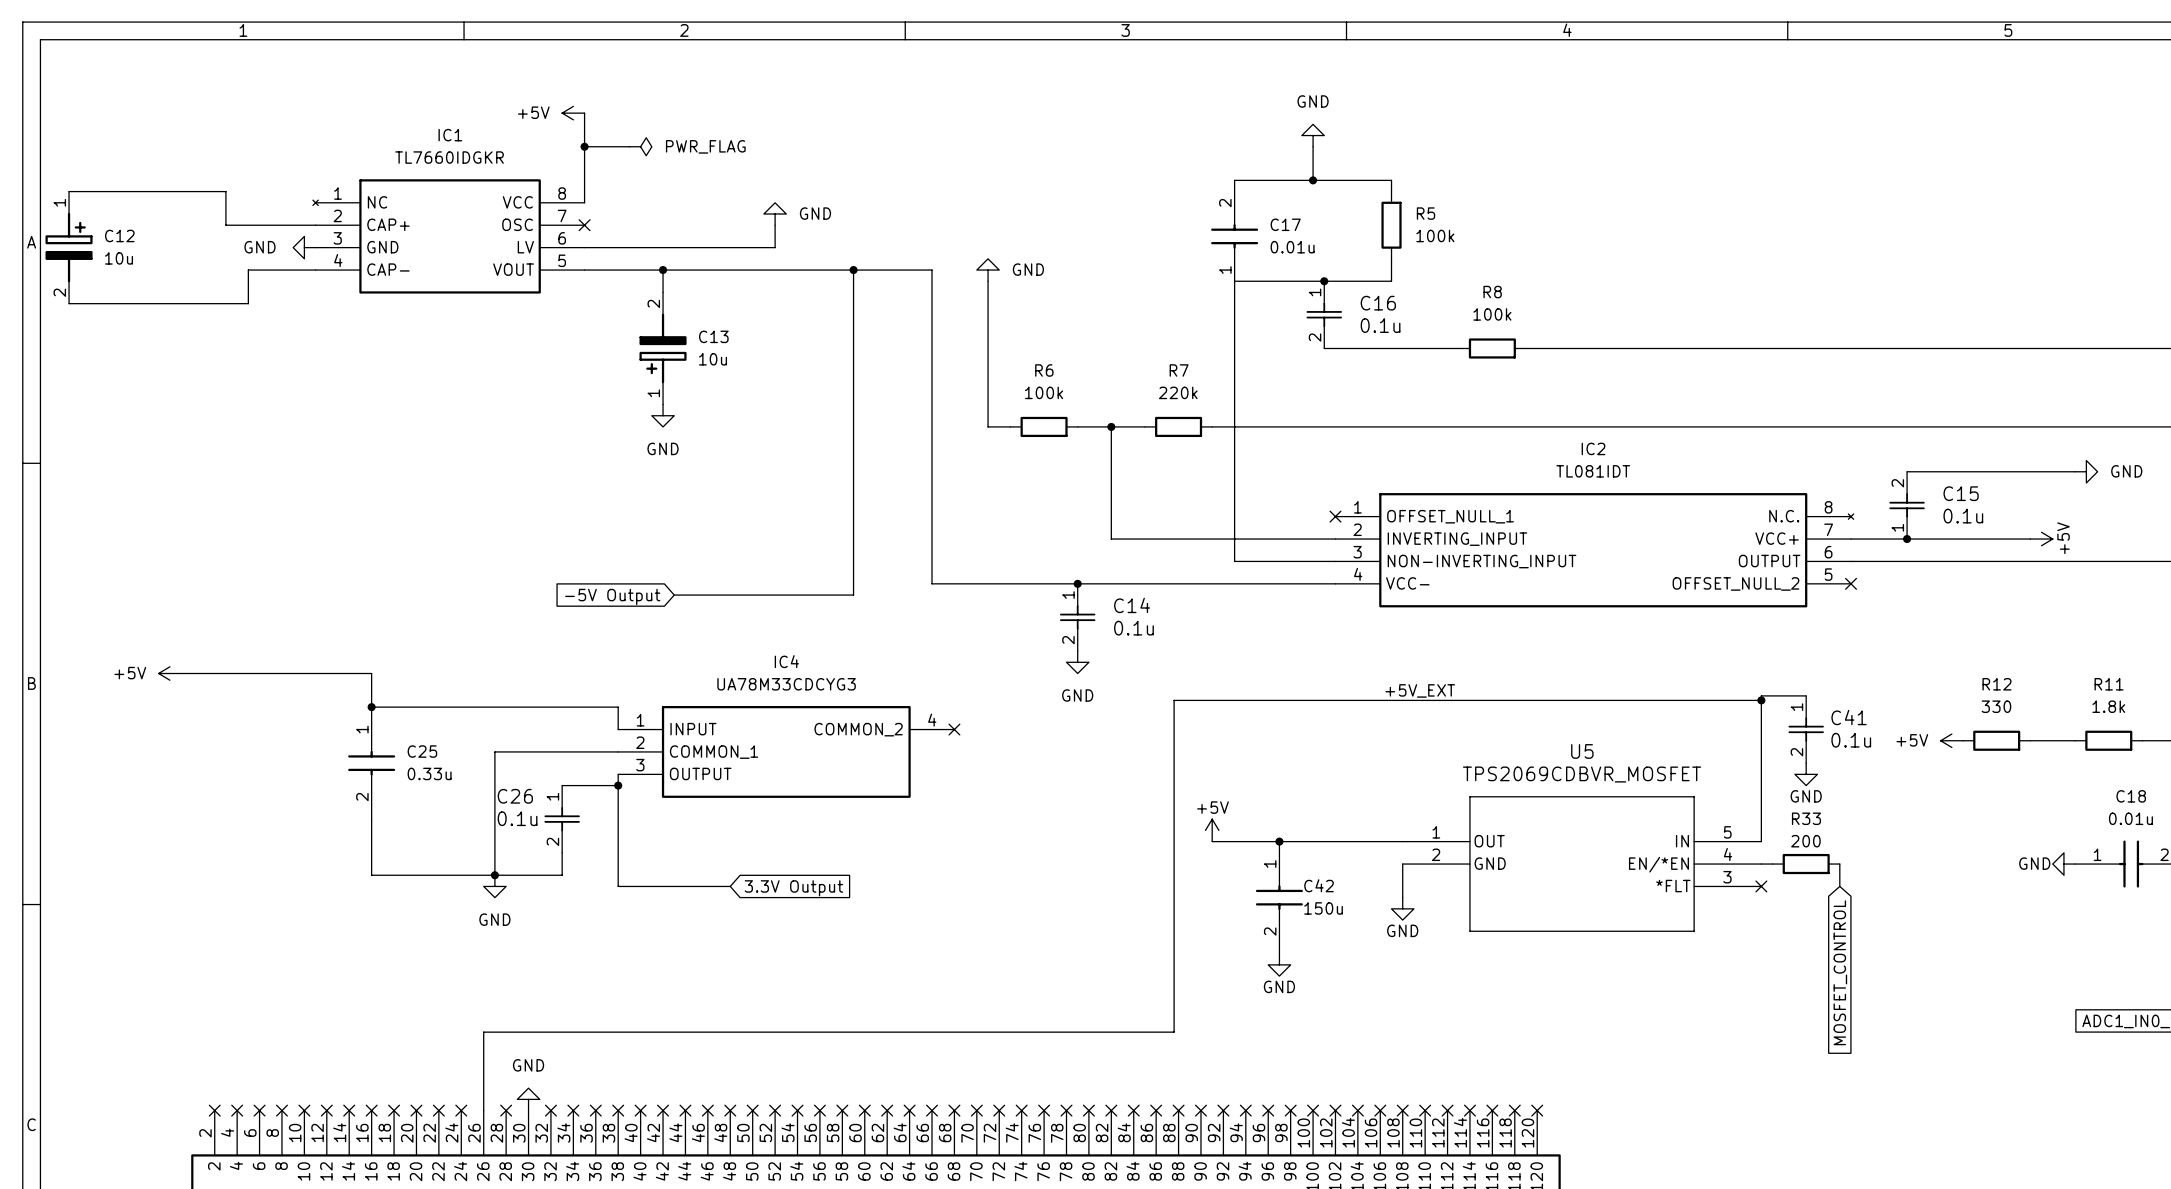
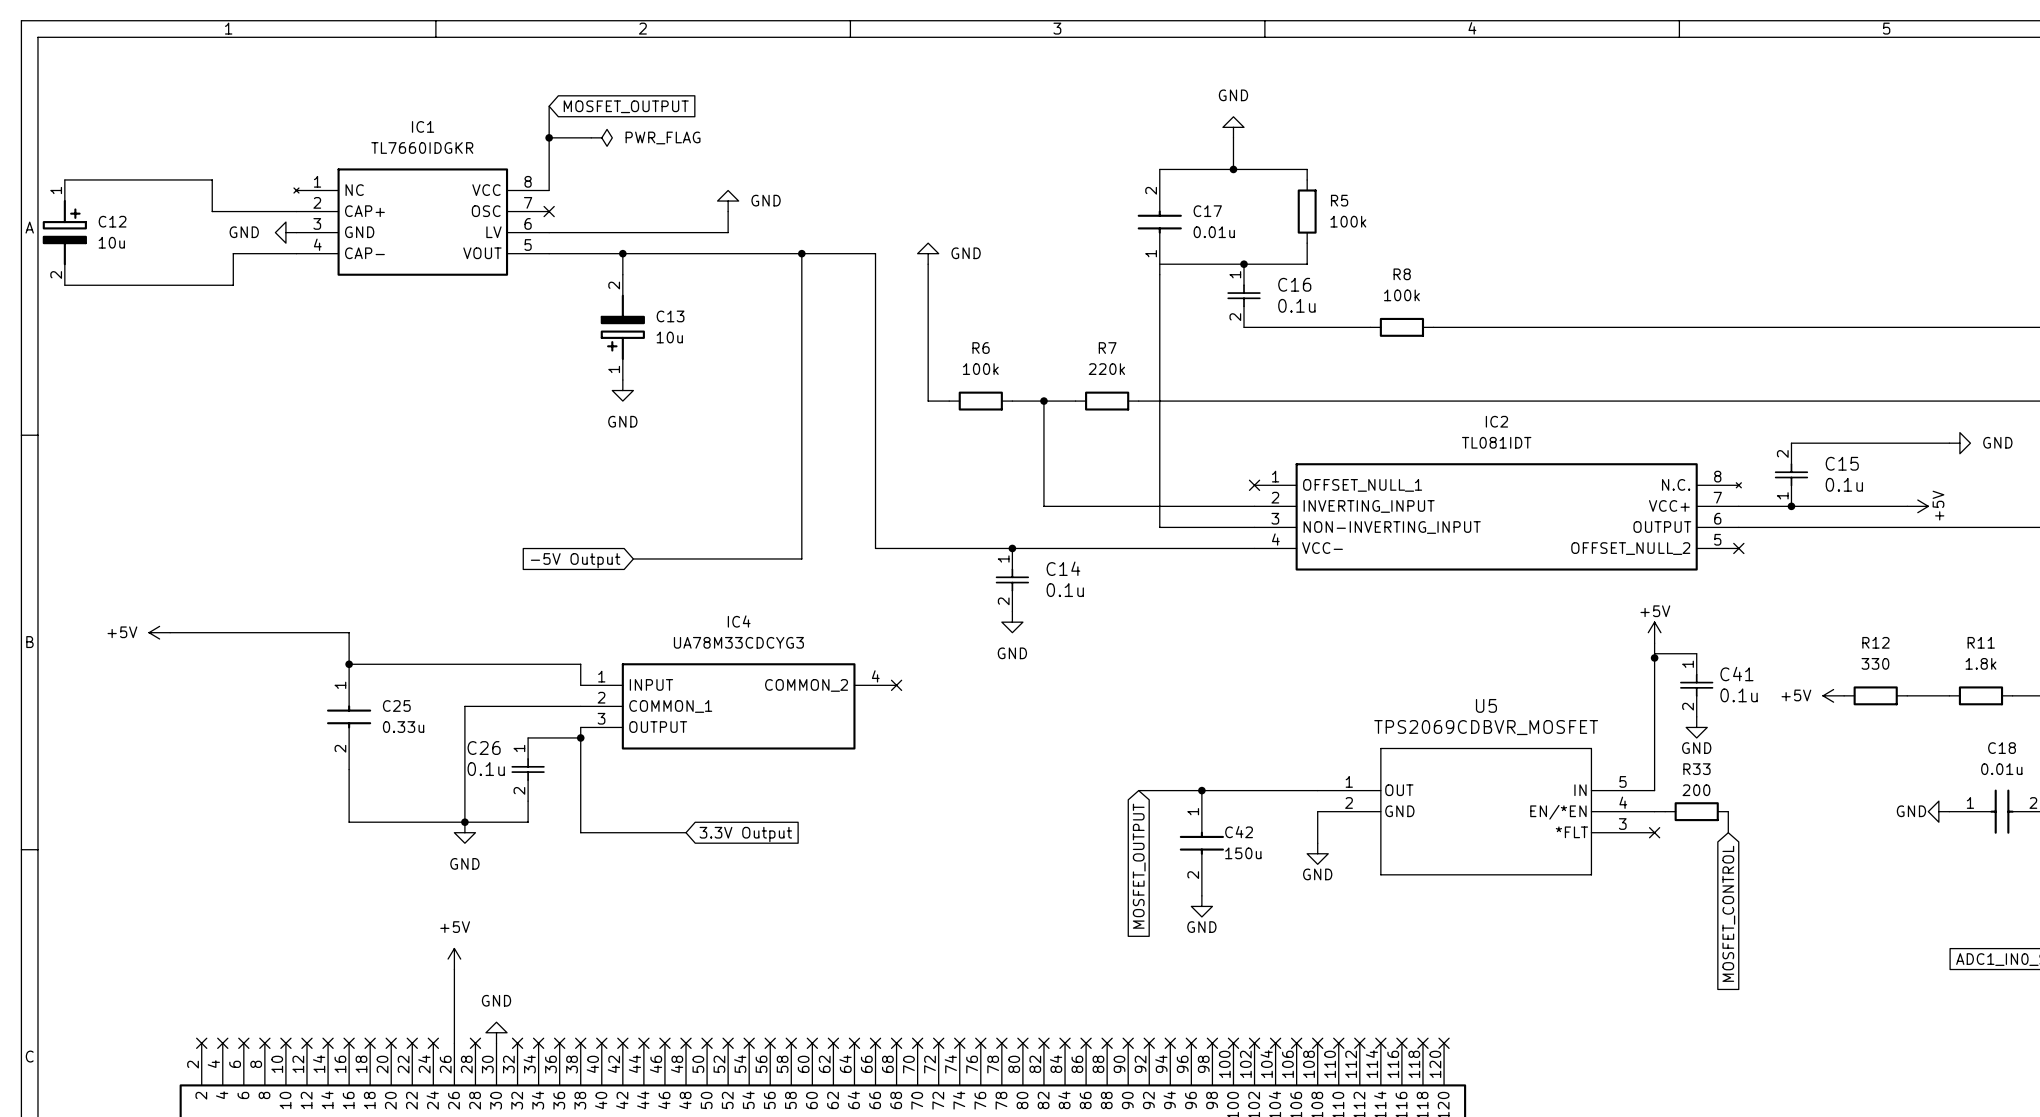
power symbol: +5V (573, 113) -> none
global label: none -> MOSFET_OUTPUT (626, 106)
power symbol: none -> +5V (1654, 632)
wire: none -> (1654, 643) (1654, 653)
label: +5V_EXT (1420, 690) -> none
wire: (1761, 700) (1174, 700) (1174, 1032) (483, 1032) -> none
power symbol: +5V (1212, 830) -> none
global label: none -> MOSFET_OUTPUT (1139, 866)
power symbol: none -> +5V (454, 959)

